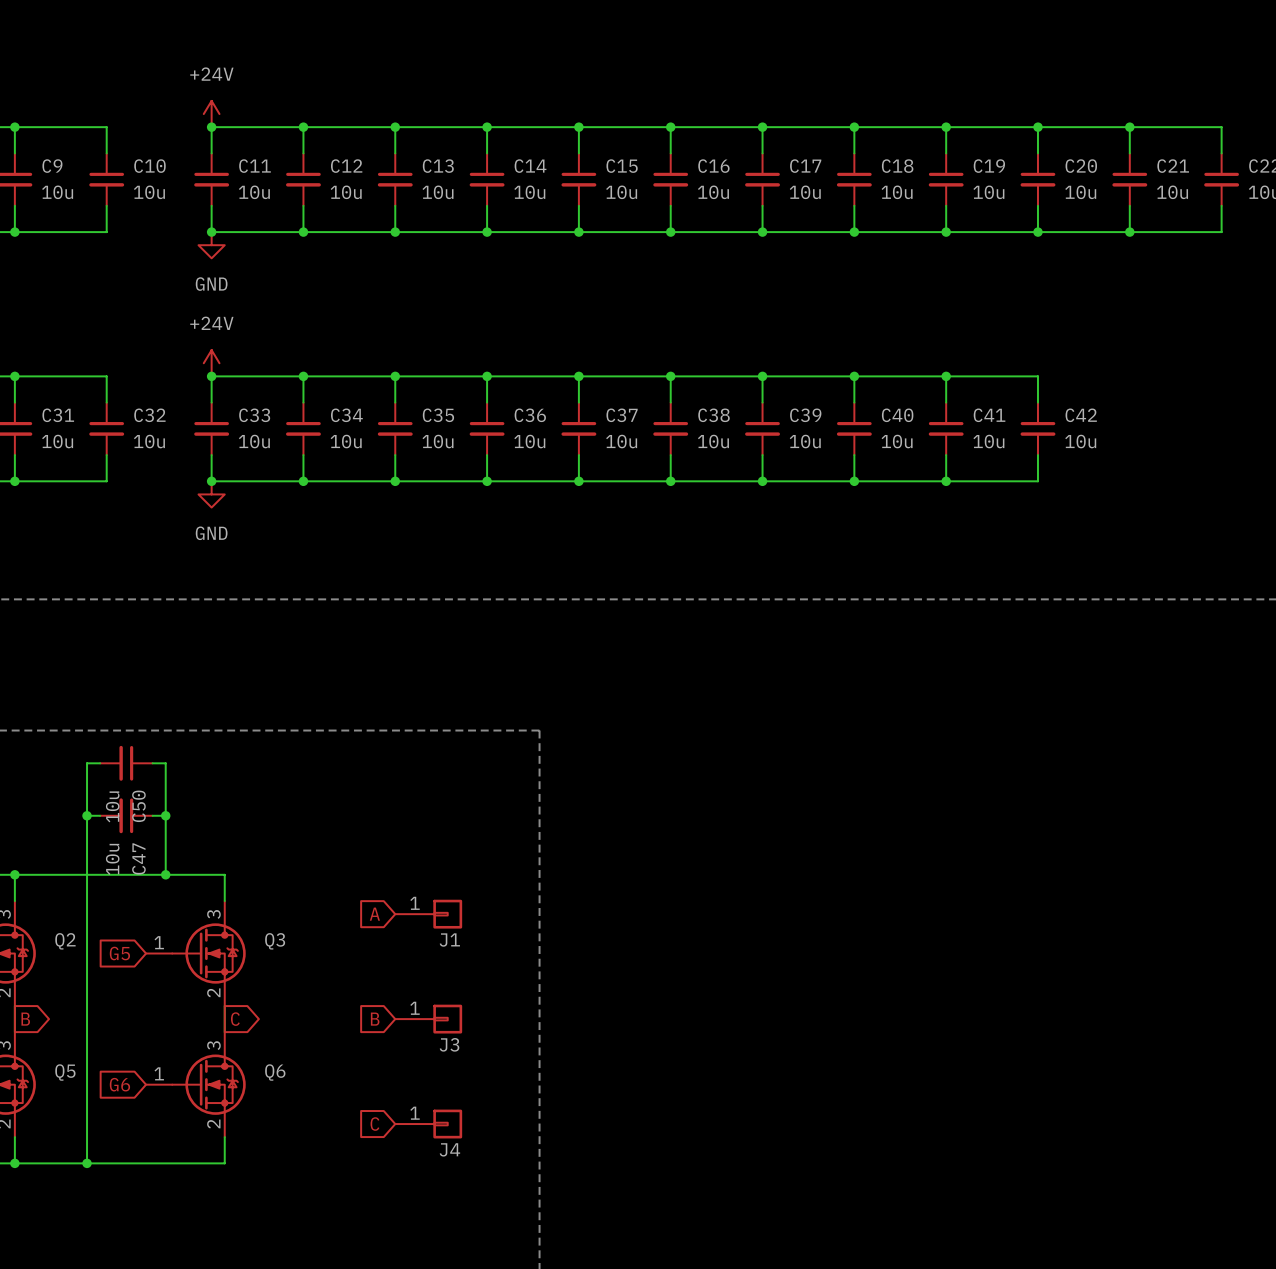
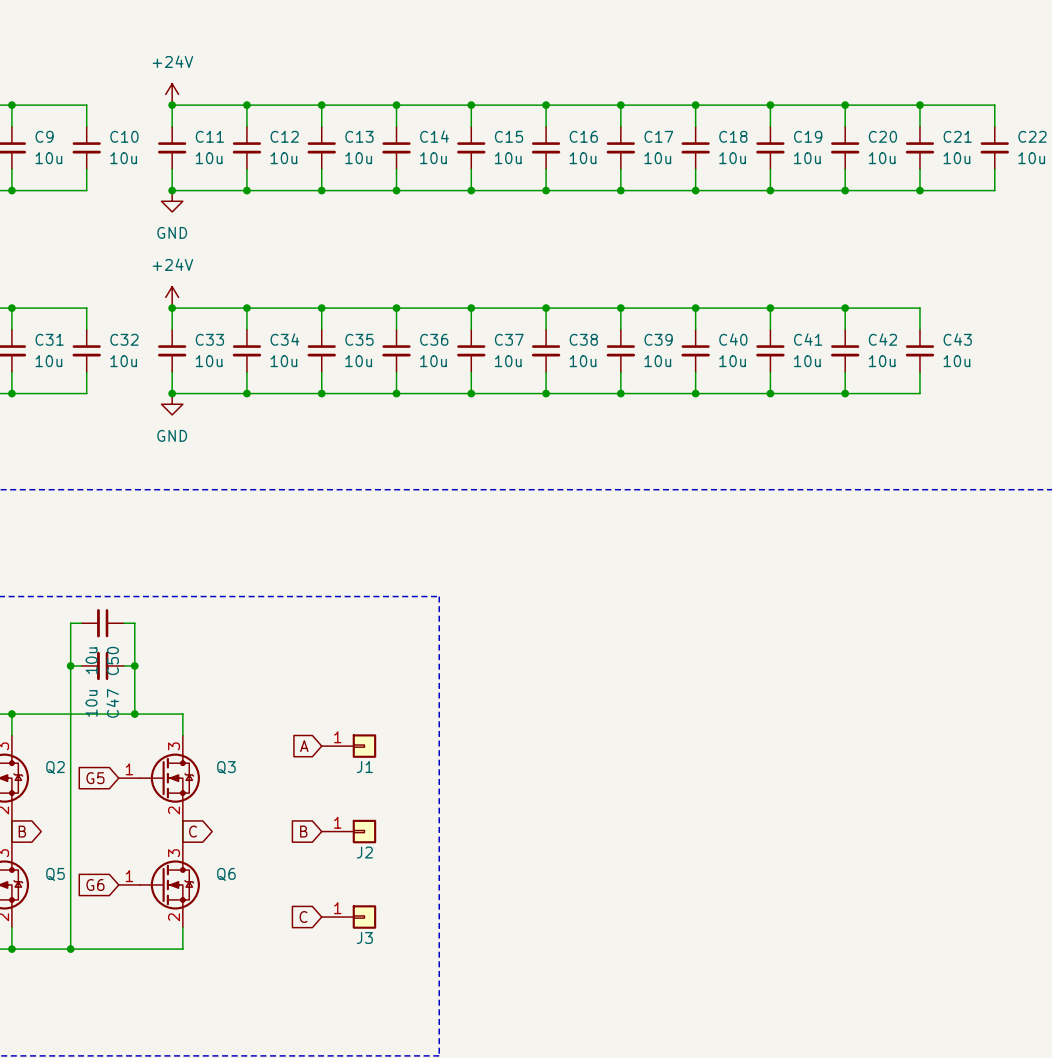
wire: none -> (845, 308) (919, 308) (919, 329)
junction: none -> (845, 308)
C43: none -> 10u (919, 350)
wire: none -> (919, 372) (919, 393) (845, 393)
junction: none -> (845, 393)
J3 name: J3 (449, 1044) -> J2 (364, 852)
J4 name: J4 (449, 1149) -> J3 (364, 937)

